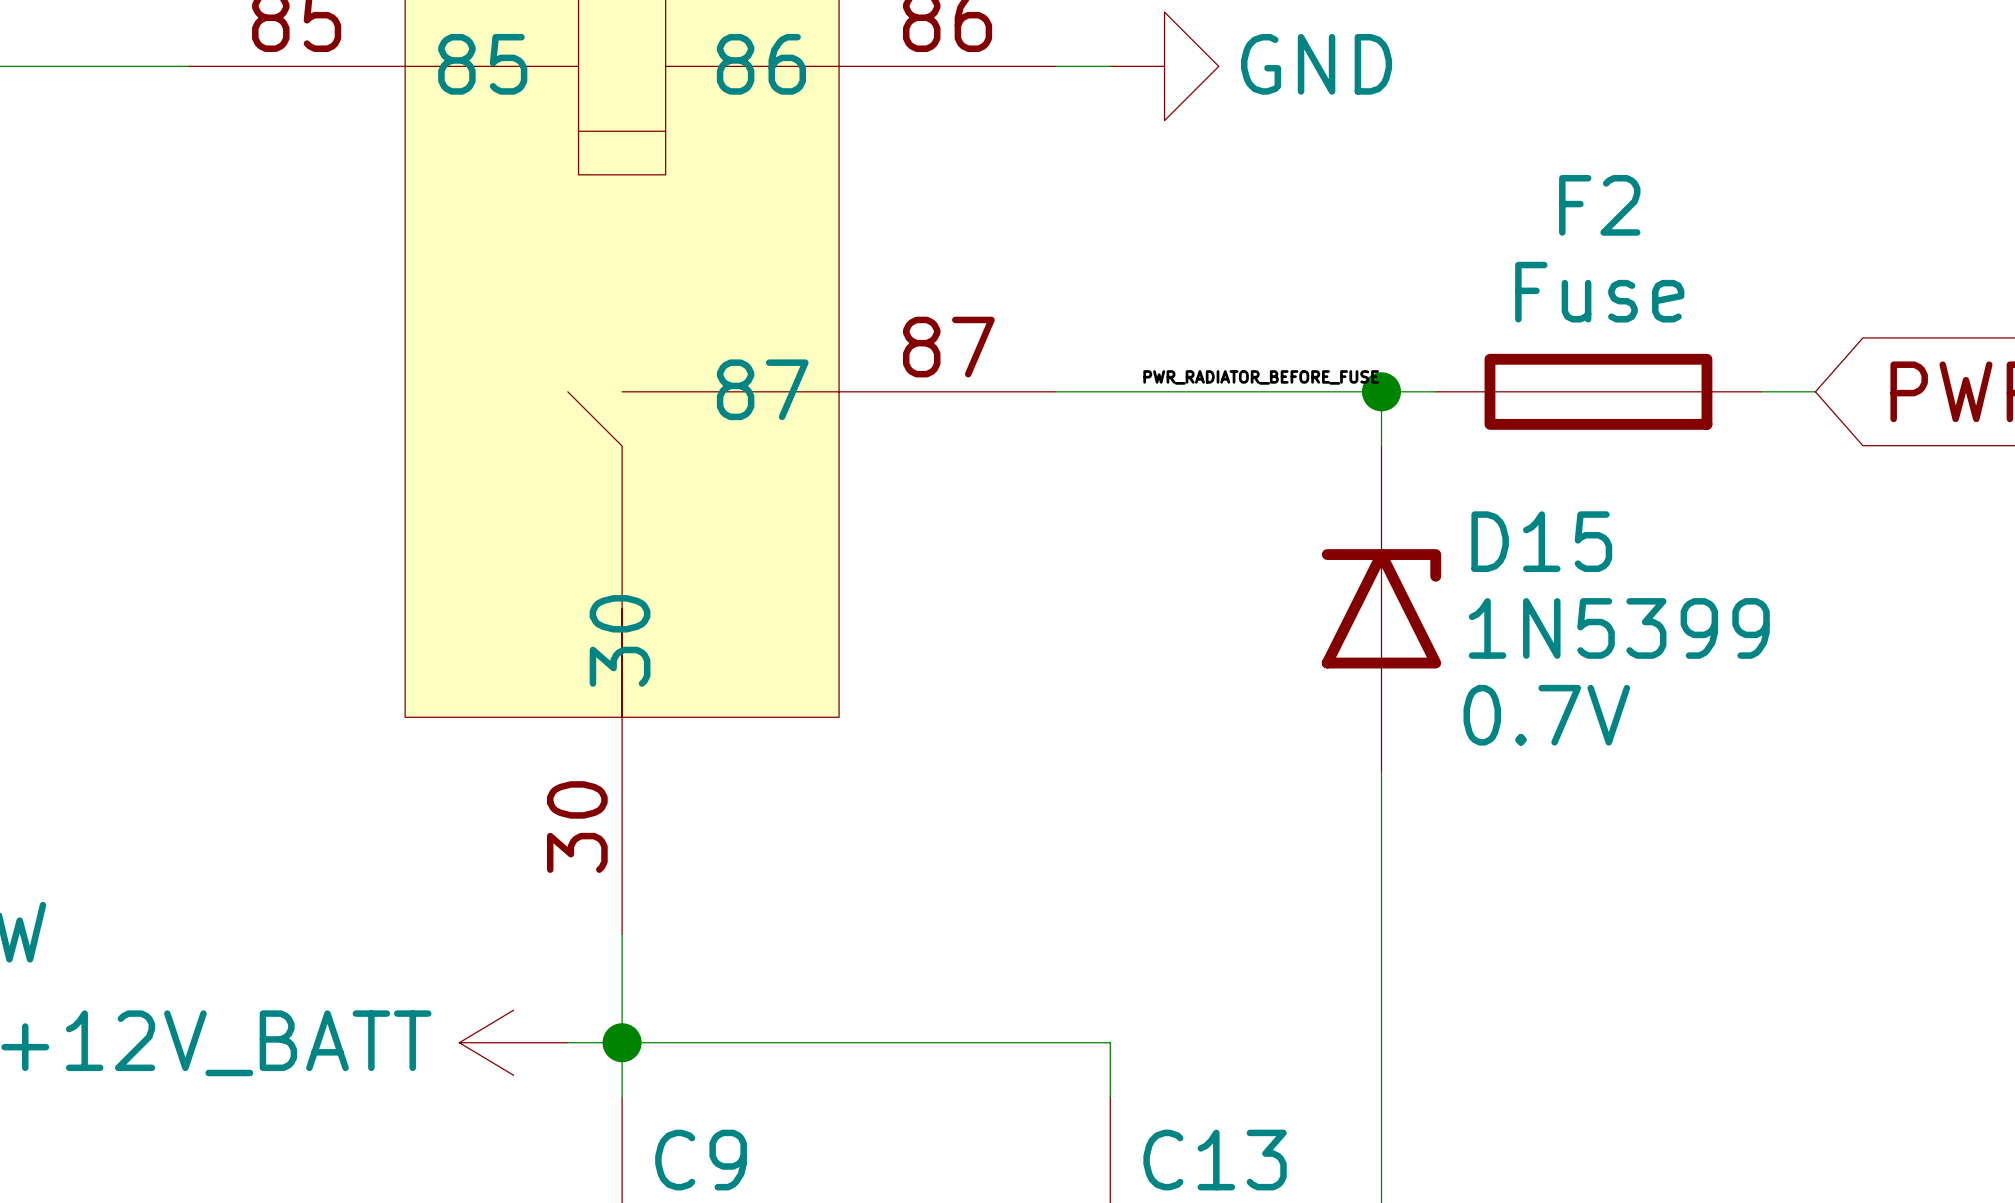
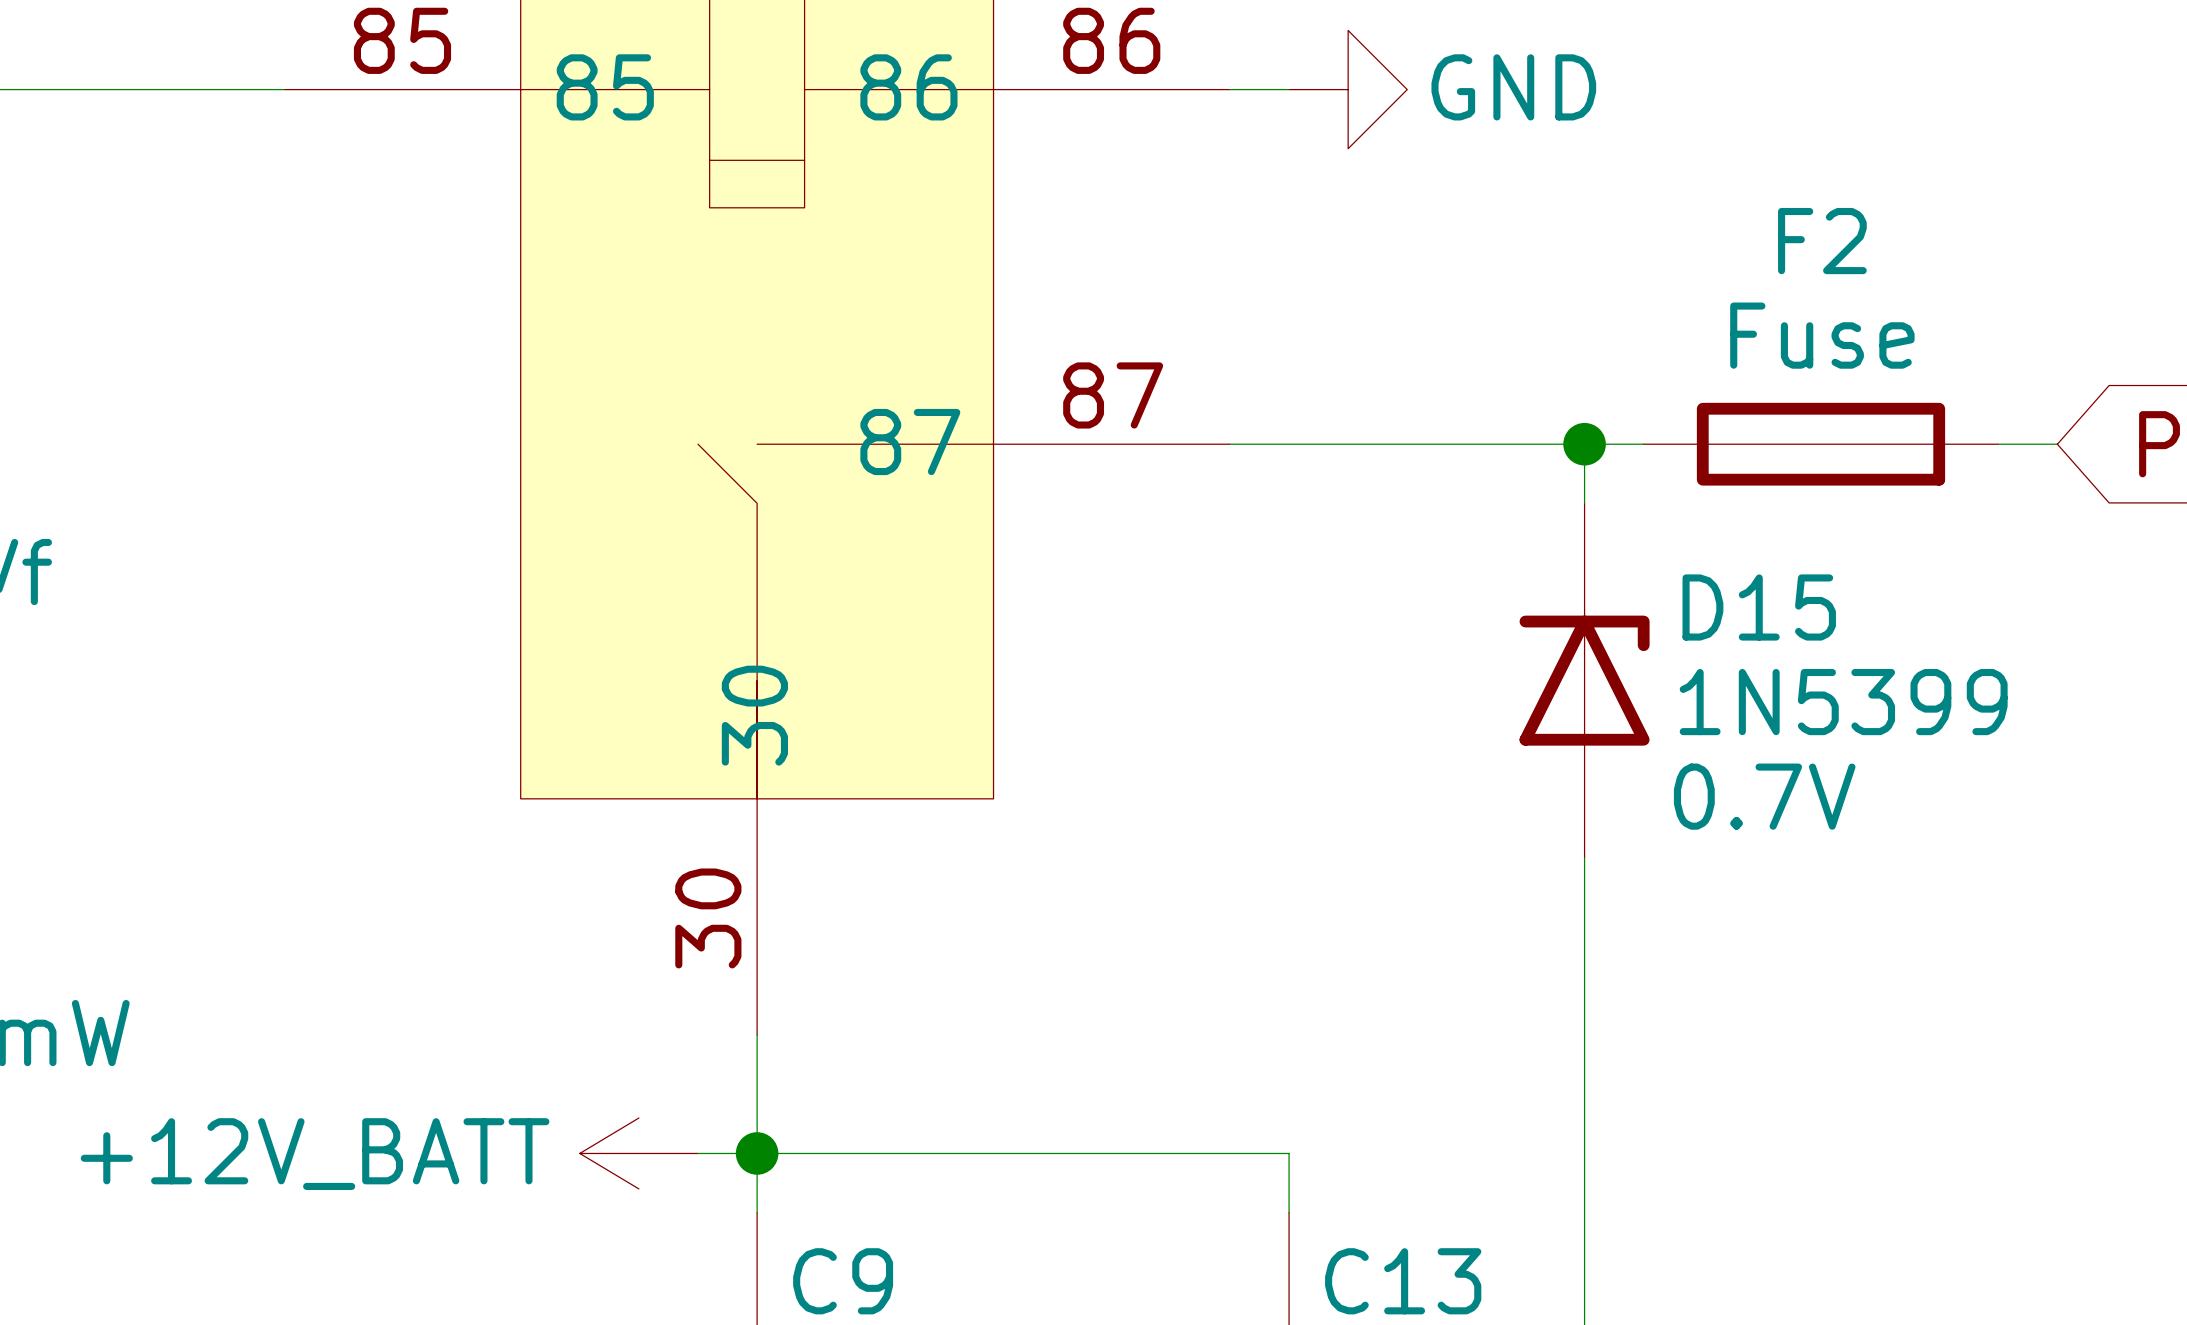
label: PWR_RADIATOR_BEFORE_FUSE (1261, 377) -> none

